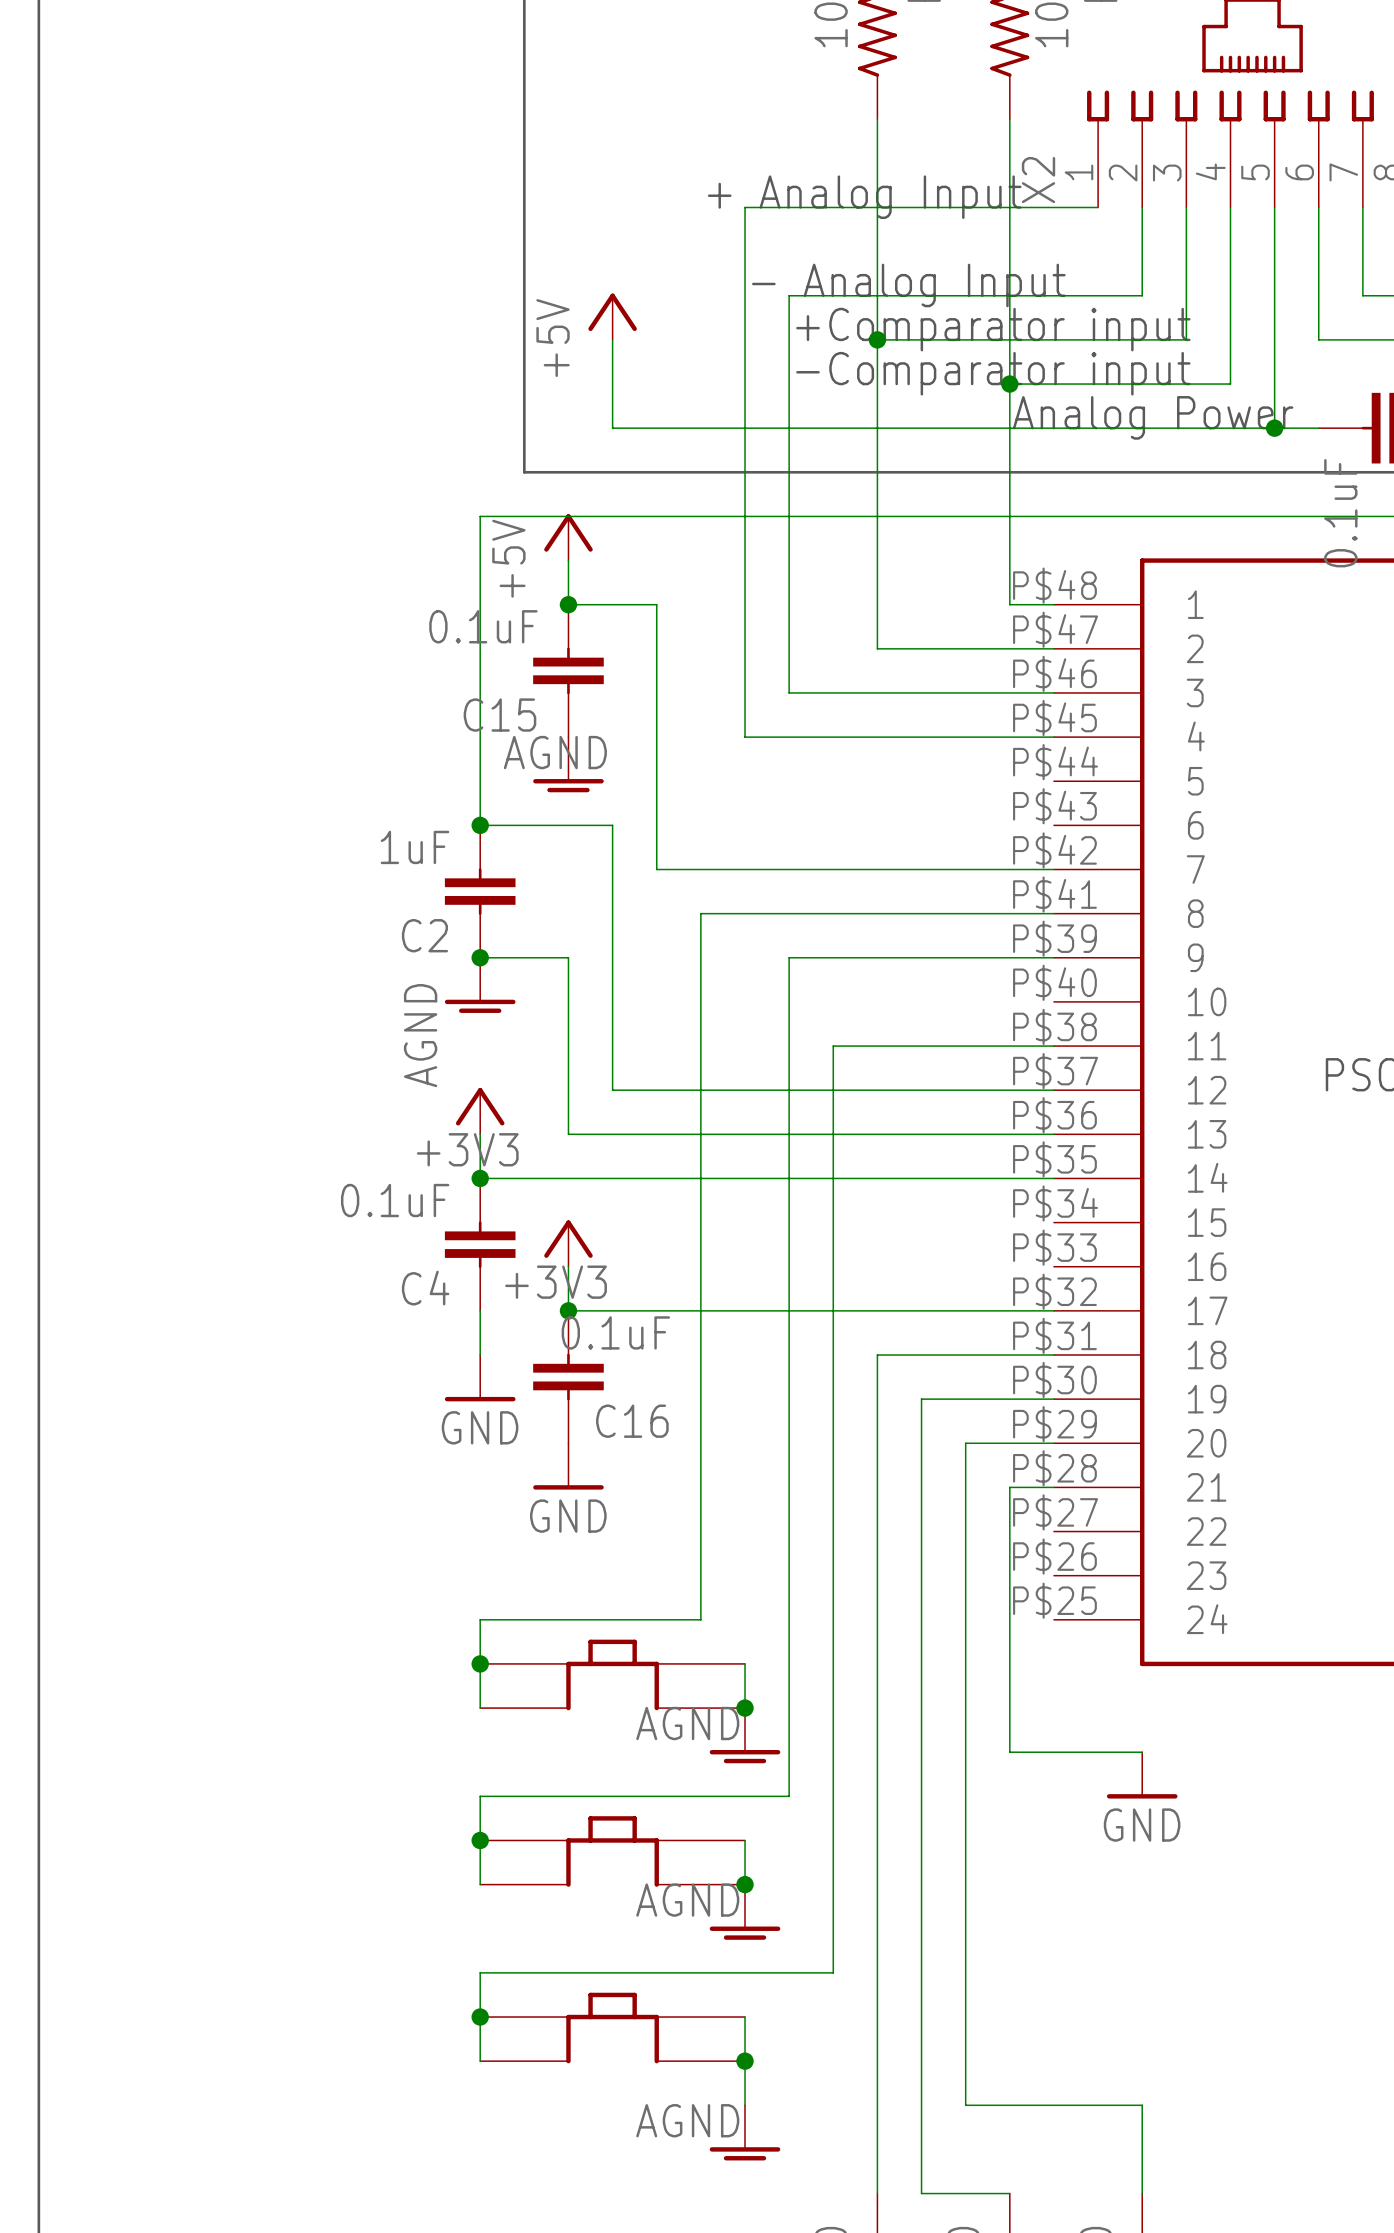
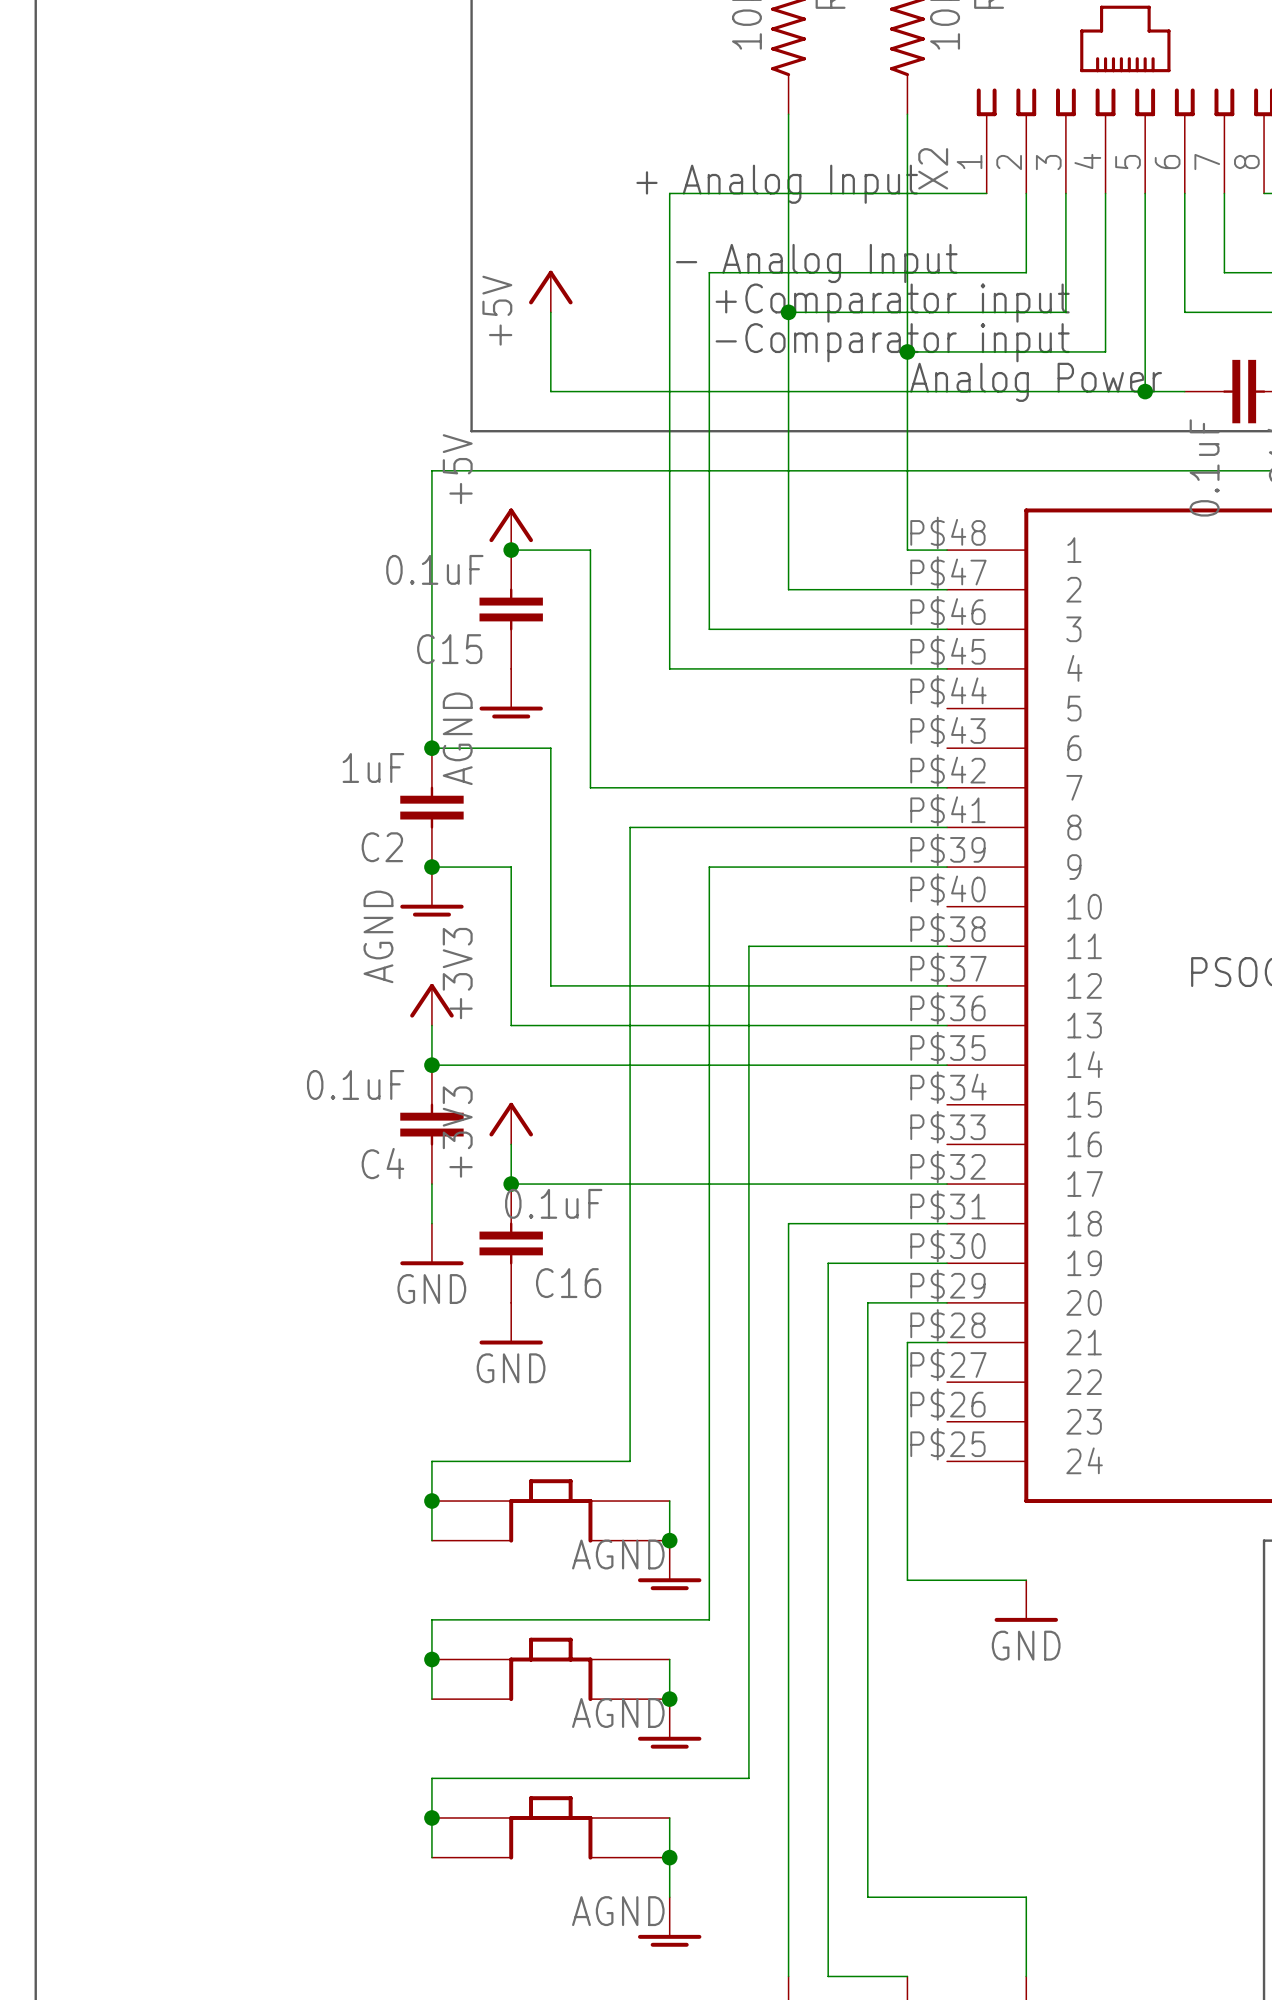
power symbol position: +5V (568, 537) -> +5V (511, 529)
power symbol text position: +5V (508, 558) -> +5V (457, 469)
power symbol text rotation: 0° (555, 752) -> 90° counterclockwise (457, 738)
power symbol text rotation: 0° (467, 1149) -> 90° counterclockwise (457, 973)
power symbol text rotation: 0° (556, 1282) -> 90° counterclockwise (457, 1132)

